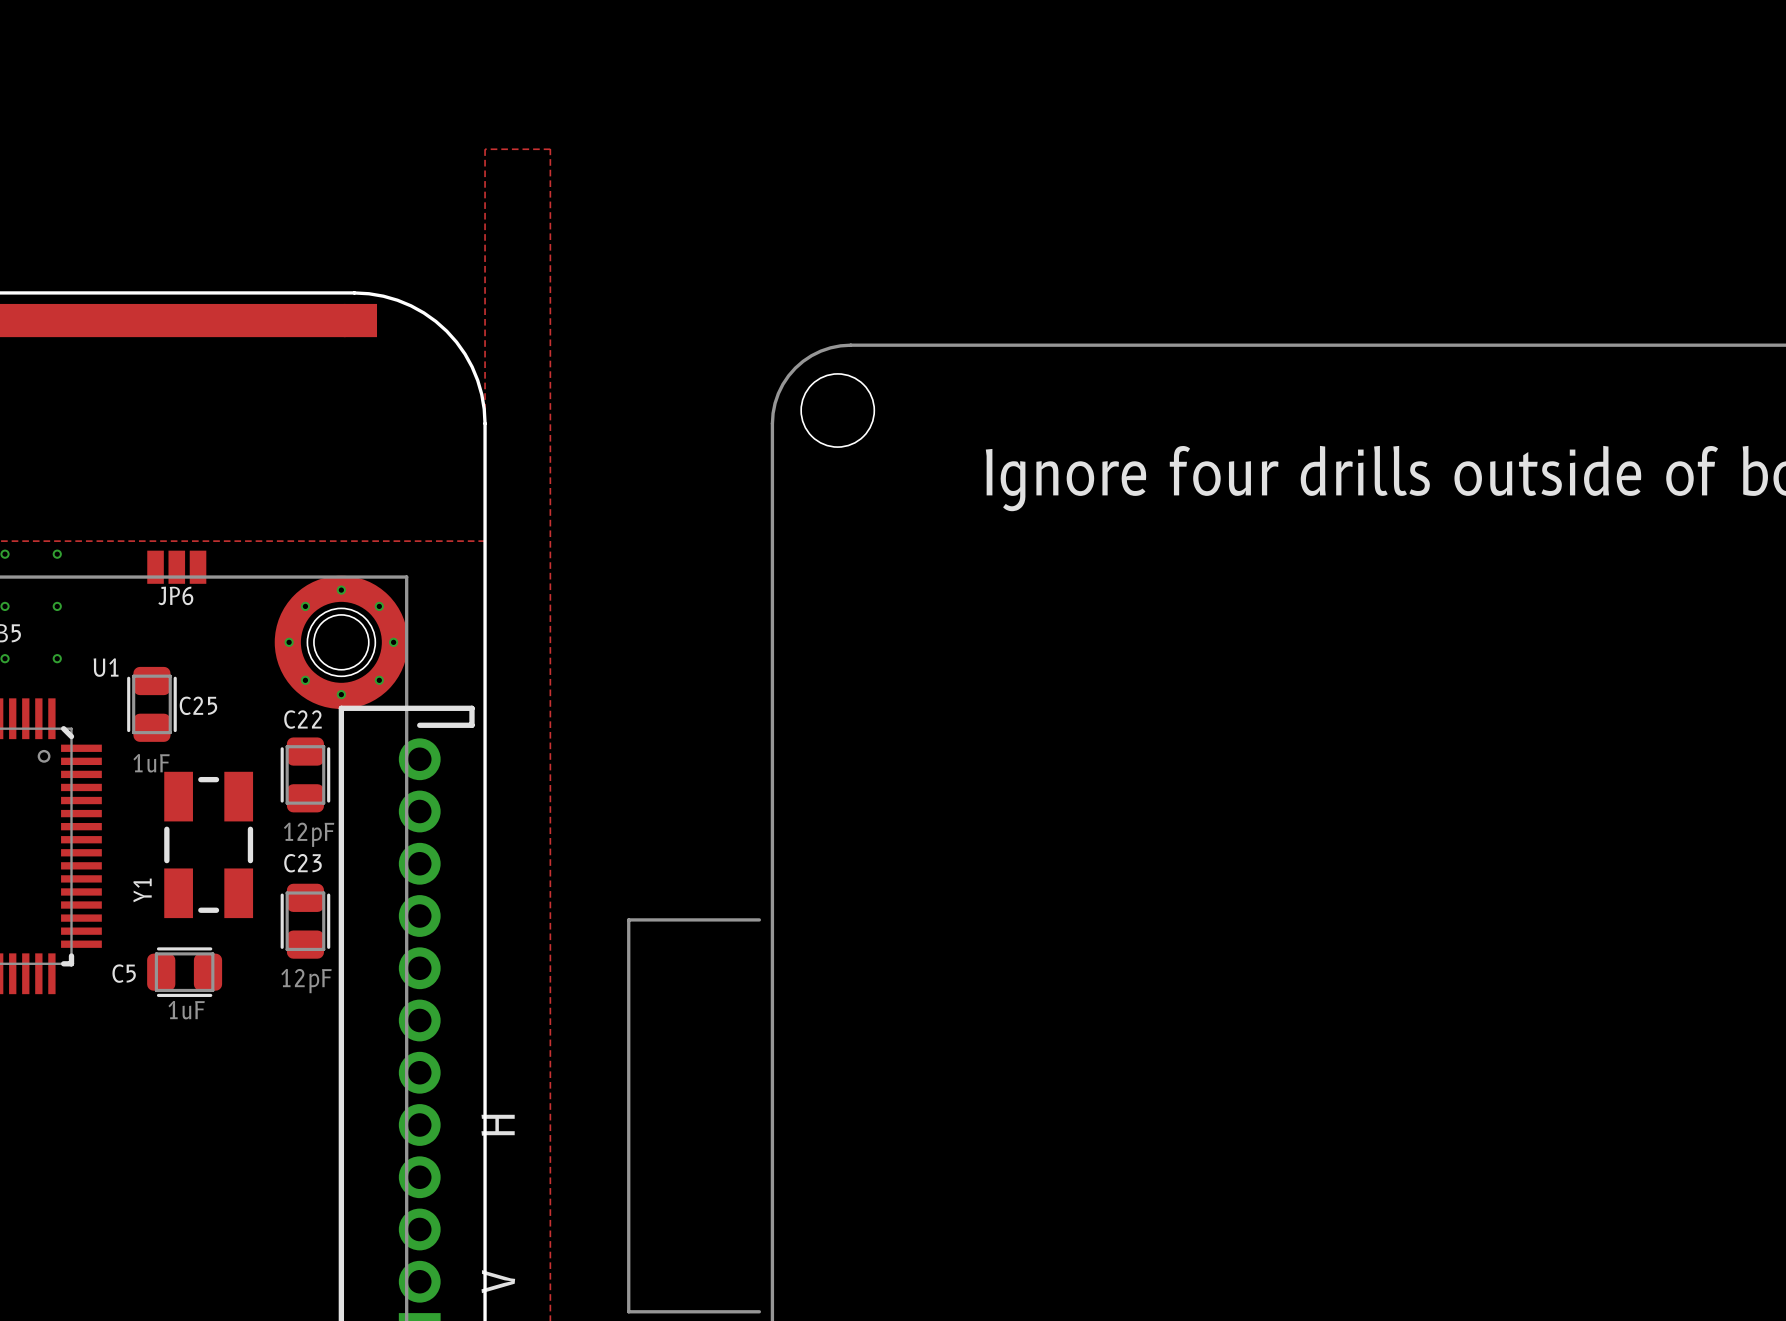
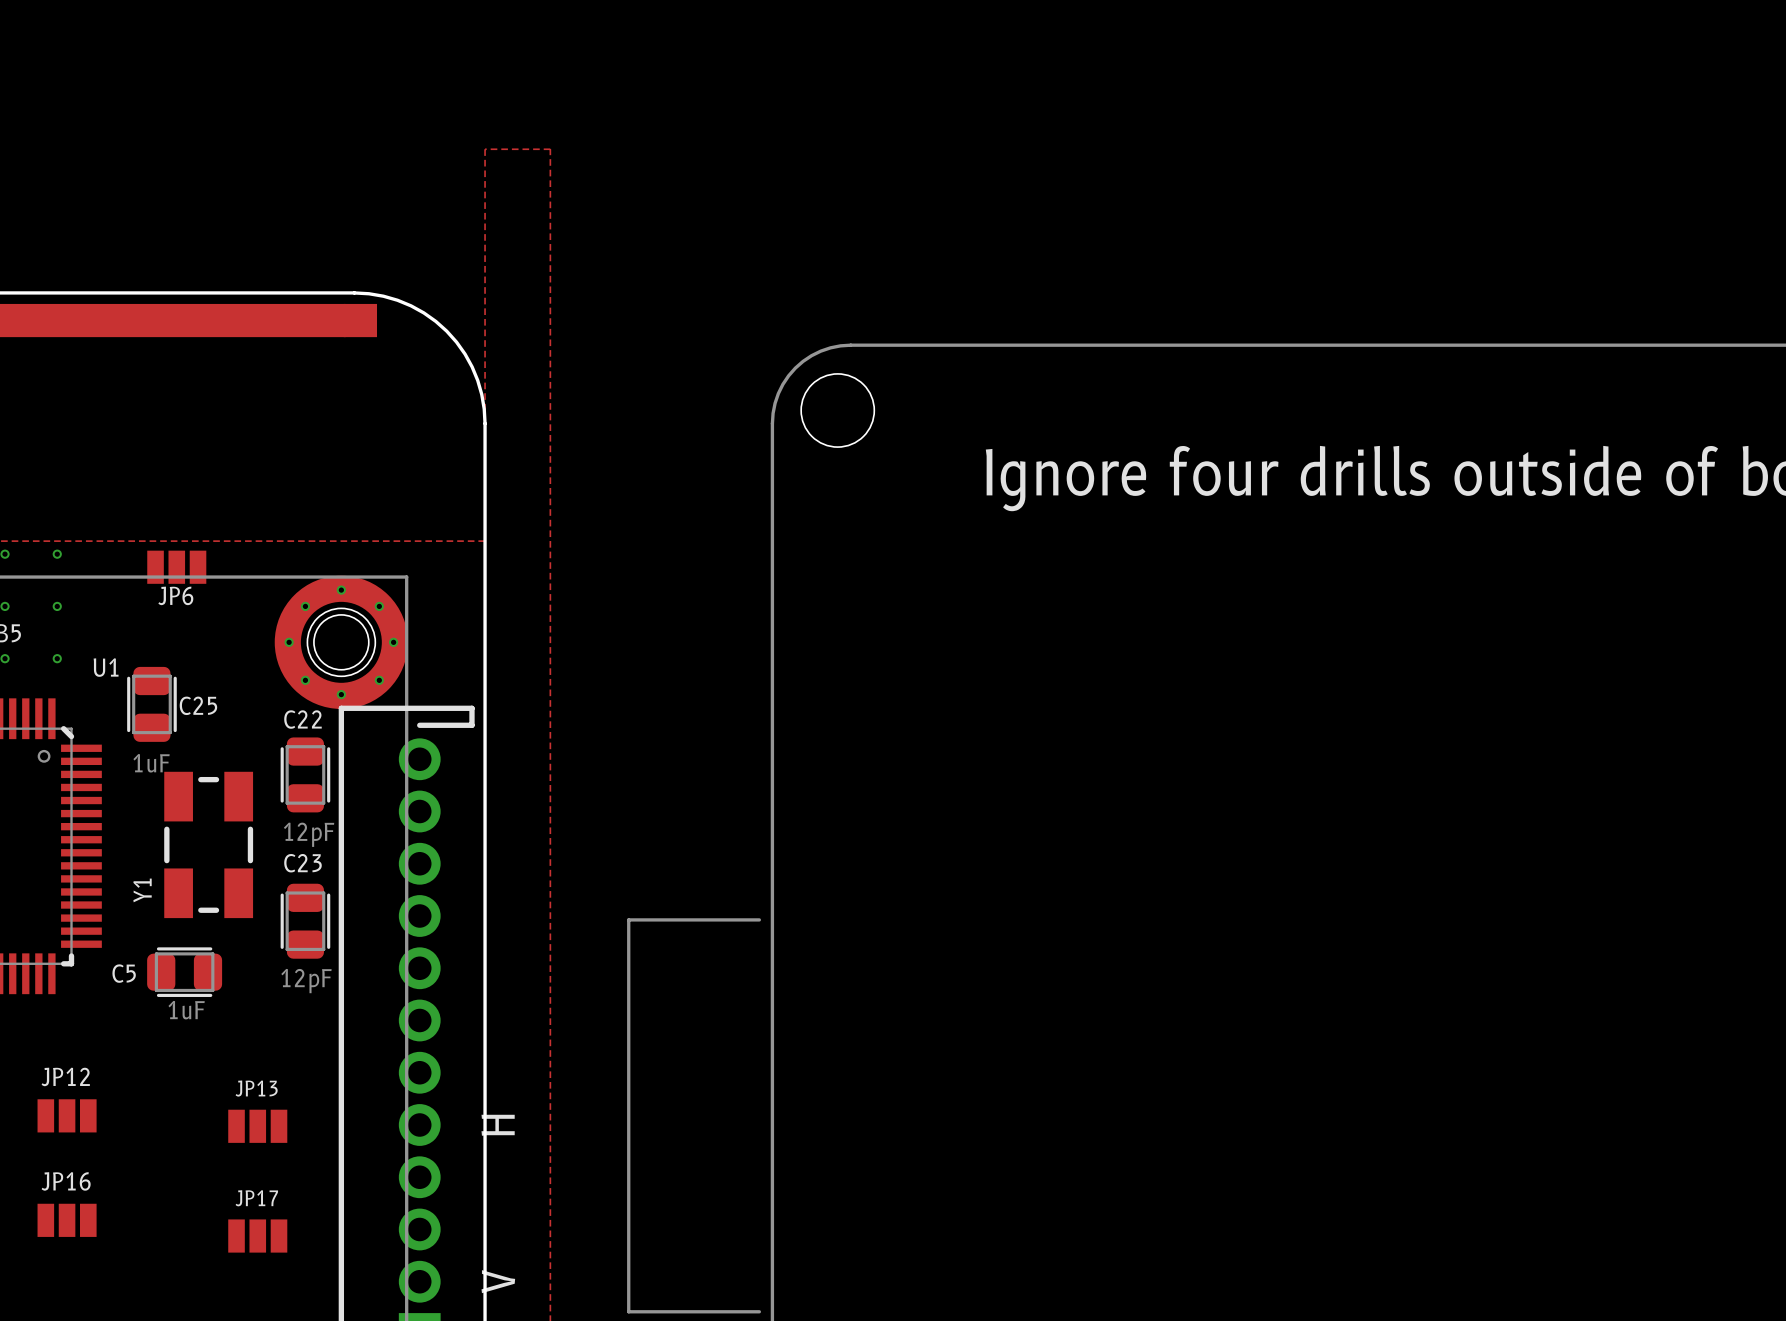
JP12: none -> (67, 1115)
JP13: none -> (257, 1126)
JP16: none -> (67, 1220)
JP17: none -> (257, 1236)

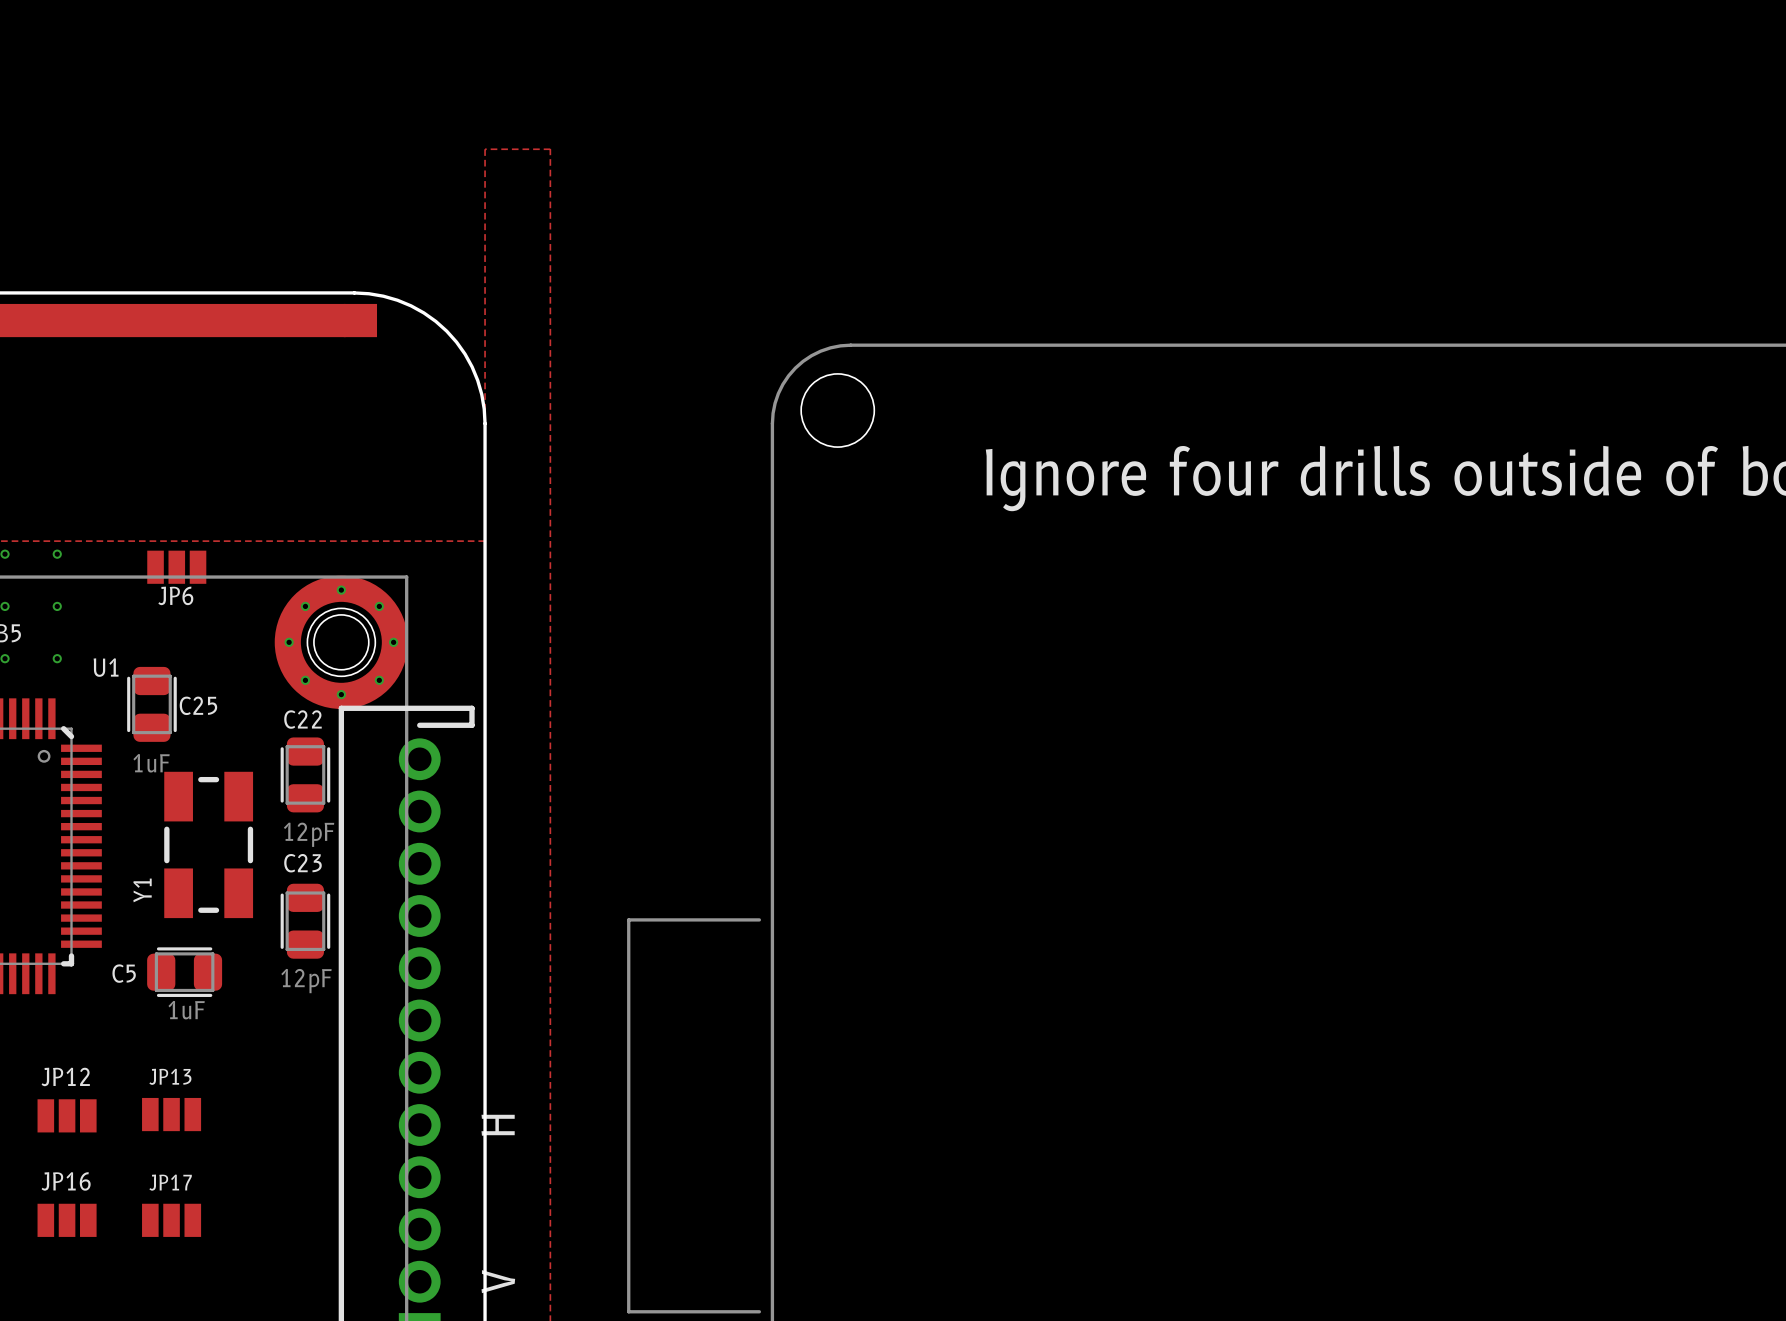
JP13 position: (257, 1126) -> (171, 1114)
JP17 position: (257, 1236) -> (171, 1220)

